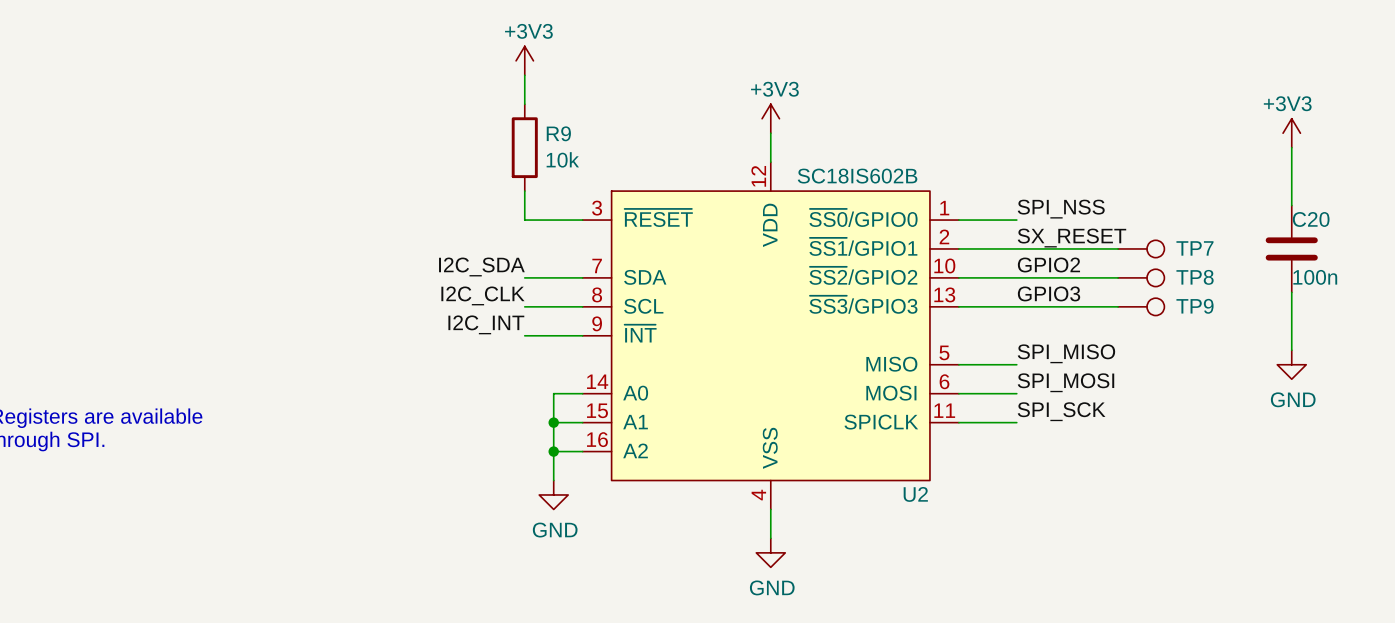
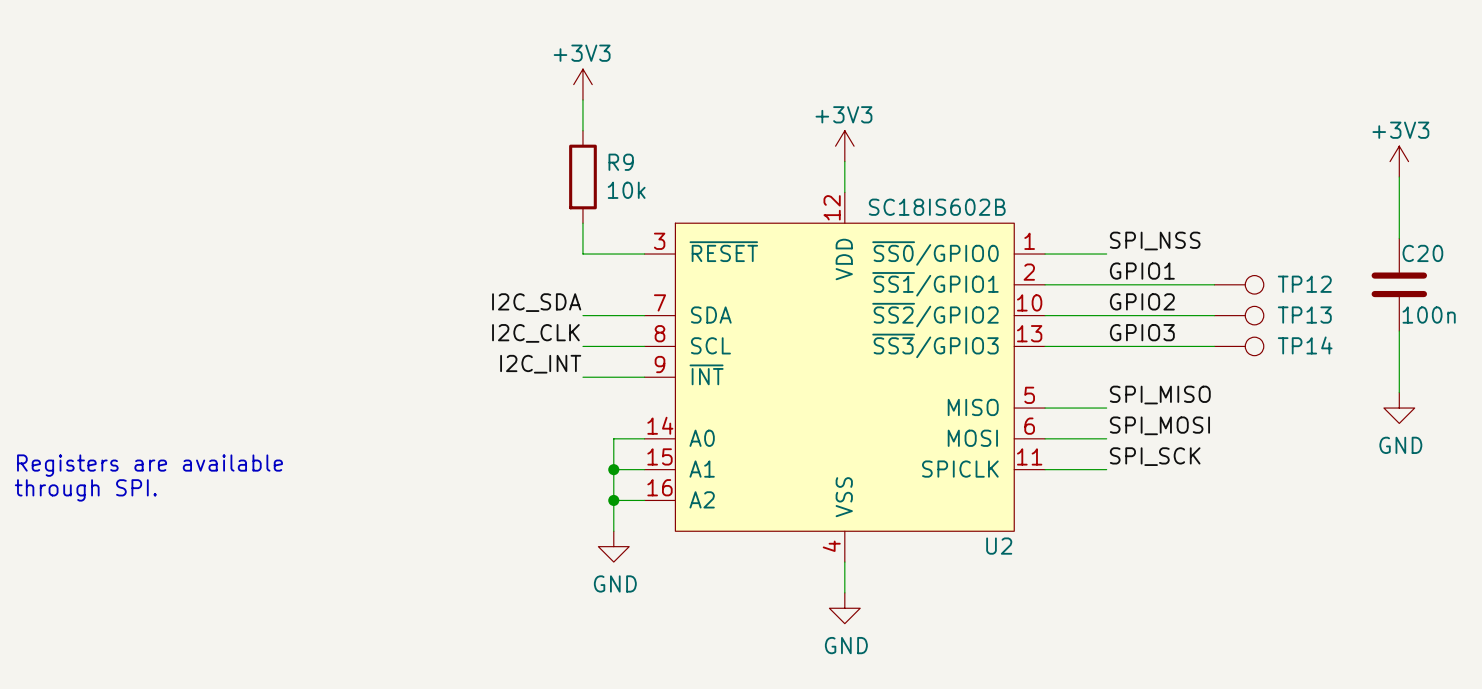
label: SX_RESET (1071, 238) -> GPIO1 (1142, 271)
TP7 name: TP7 (1194, 248) -> TP12 (1304, 284)
TP8 name: TP8 (1195, 277) -> TP13 (1304, 315)
TP9 name: TP9 (1195, 306) -> TP14 (1305, 345)

